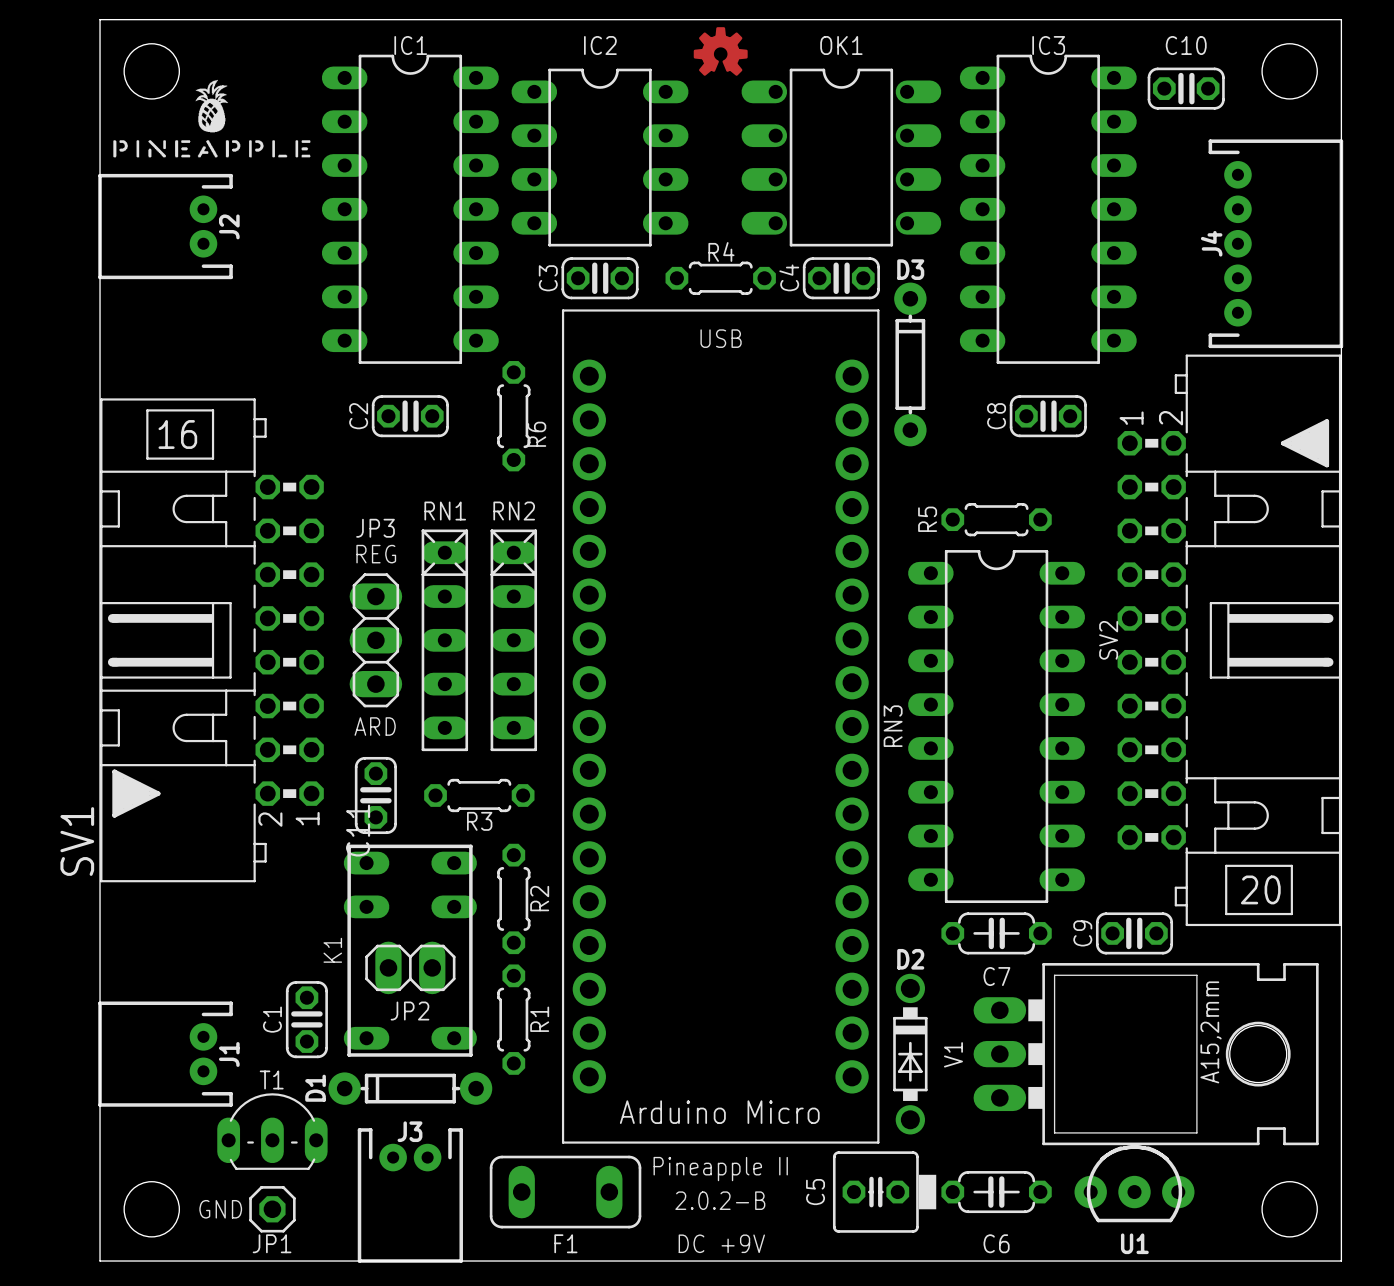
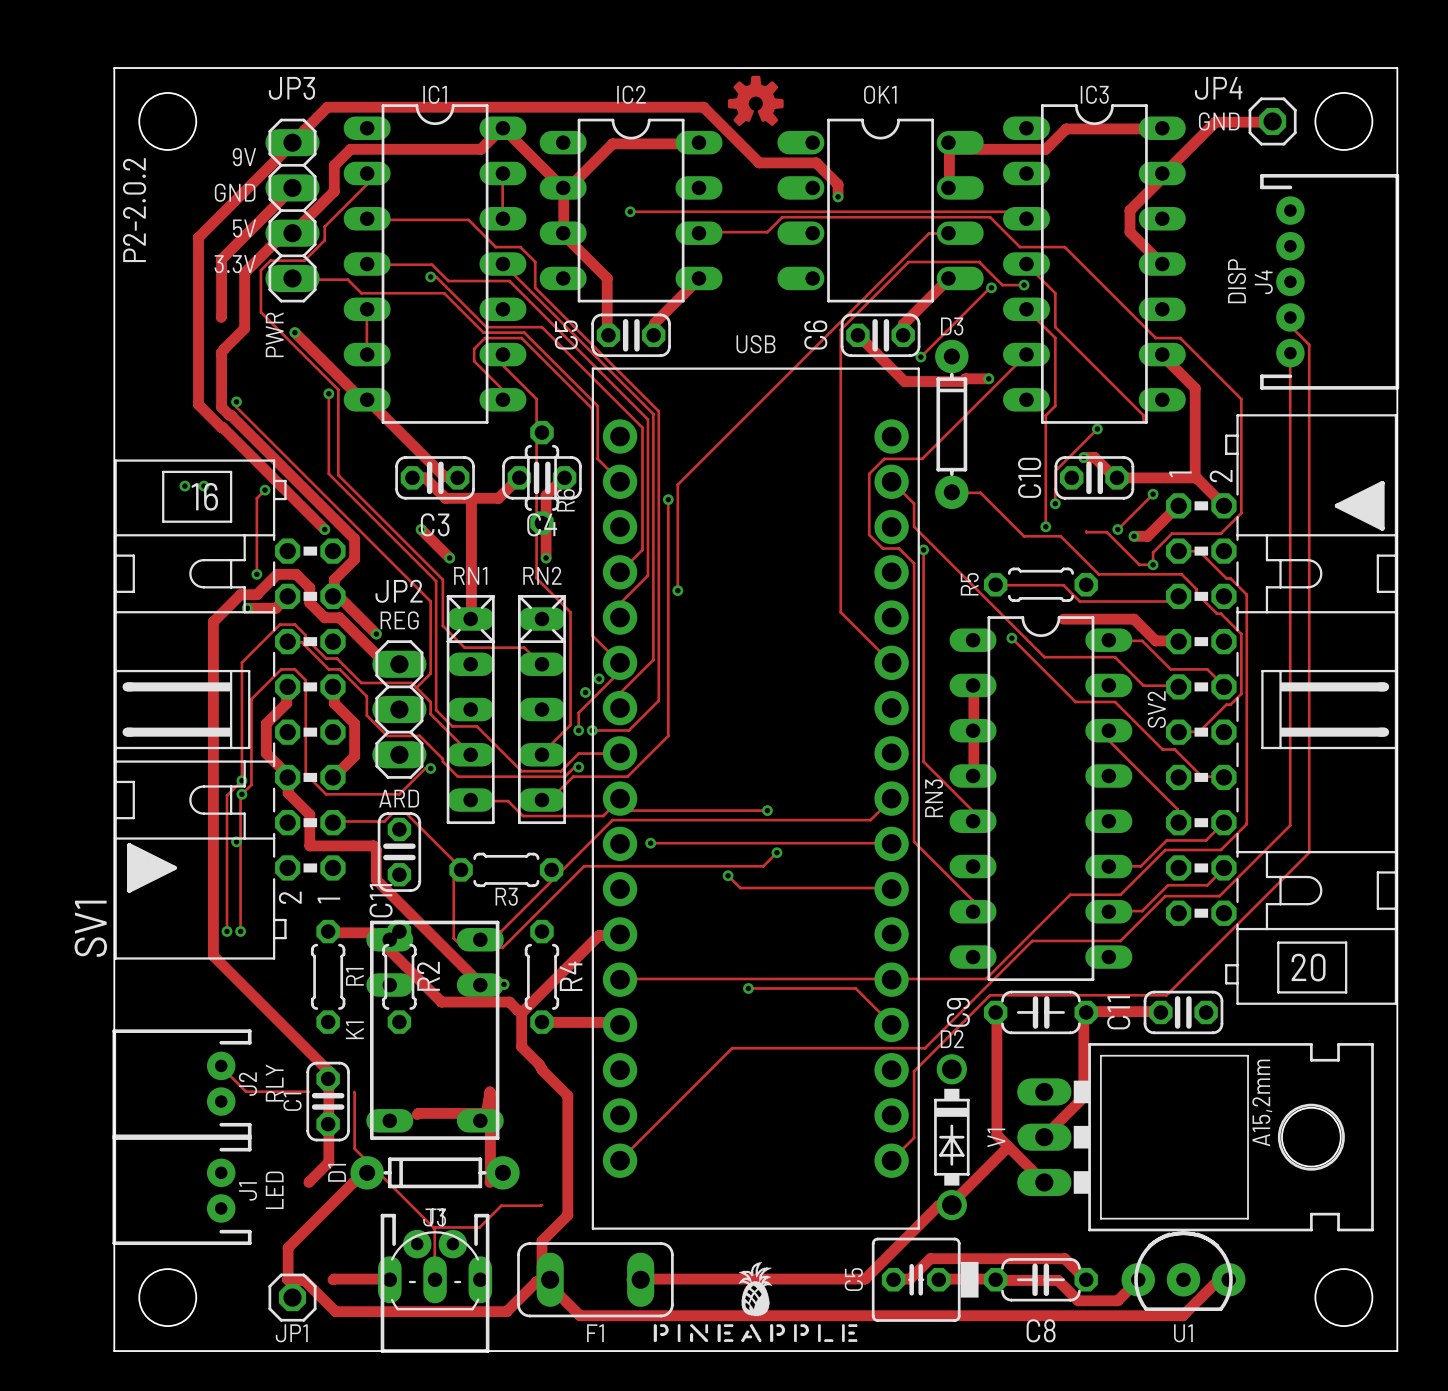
text: none -> GND (1219, 121)
track: none -> (1272, 121) (1215, 122) (1166, 171) (1161, 173) (1161, 179) (1129, 210) (1129, 232) (1162, 264)
JP4: none -> (1272, 121)
track: none -> (1162, 128) (1066, 128) (1045, 149) (953, 149) (948, 142) (948, 187)
drawing: [113, 79, 311, 158] -> none
C10: (1186, 88) -> none
track: none -> (698, 142) (612, 143) (569, 187) (563, 187)
text: none -> 9V (244, 157)
track: none -> (367, 173) (366, 184) (324, 226) (324, 240) (304, 260) (270, 260) (260, 270) (260, 312) (338, 389) (338, 475) (442, 579) (442, 625) (464, 647) (524, 647) (541, 664)
track: none -> (502, 173) (502, 218)
track: none -> (292, 187) (221, 259) (221, 317)
track: none -> (563, 187) (563, 233) (607, 278) (608, 335)
track: none -> (563, 187) (502, 128) (480, 149) (350, 149) (334, 165) (334, 191) (292, 233) (284, 233) (244, 272) (244, 328) (221, 353) (221, 407) (354, 539) (354, 559) (334, 579) (332, 596) (339, 597) (376, 634)
text: none -> GND (235, 192)
track: none -> (838, 196) (838, 184) (816, 162) (759, 162) (703, 107) (327, 107) (198, 237) (198, 404) (324, 529)
via: none -> (838, 196)
text: none -> P2-2.0.2 (134, 210)
JP3: none -> (292, 210)
track: none -> (630, 211) (1018, 211) (1026, 218)
via: none -> (630, 211)
track: none -> (367, 218) (468, 219) (495, 247) (520, 247) (535, 262) (535, 287) (658, 411) (658, 700) (628, 730) (592, 730)
text: none -> 5V (244, 228)
track: none -> (698, 233) (767, 232) (782, 217) (990, 217) (1020, 247) (1064, 247) (1155, 338) (1180, 338) (1241, 399) (1241, 513) (1220, 533) (1172, 533) (1153, 552) (1153, 564) (1139, 564) (1106, 532) (1086, 531)
track: none -> (948, 233) (929, 233) (677, 484) (677, 590)
text: none -> 3.3V (235, 264)
track: none -> (367, 264) (432, 264) (448, 281) (509, 281) (647, 419) (647, 575) (620, 602) (620, 617)
track: none -> (502, 264) (653, 414) (653, 659) (620, 692) (620, 708)
track: none -> (1026, 264) (1055, 293) (1055, 327) (1143, 415) (1143, 420)
track: none -> (430, 276) (436, 276) (486, 327) (542, 327) (642, 427) (642, 549) (620, 572)
via: none -> (430, 276)
track: none -> (292, 278) (347, 279) (361, 293) (444, 293) (483, 332) (524, 332) (597, 405) (597, 458) (620, 481)
track: none -> (698, 278) (654, 323) (653, 335)
track: none -> (948, 278) (903, 324) (903, 335)
J2 position: (165, 226) -> (182, 1083)
text: none -> DISP (1236, 281)
track: none -> (1024, 285) (1002, 285) (979, 262) (908, 262) (840, 329) (840, 612) (891, 662)
via: none -> (1024, 285)
track: none -> (991, 287) (920, 357)
via: none -> (991, 287)
J4 position: (1275, 243) -> (1329, 281)
track: none -> (367, 309) (366, 354)
track: none -> (1026, 309) (1055, 338) (1055, 405) (1045, 415) (1045, 526)
track: none -> (1290, 317) (1291, 327) (1309, 344) (1309, 852) (1166, 995) (990, 995) (914, 1071) (914, 1137) (891, 1160)
track: none -> (294, 332) (360, 397) (368, 400) (444, 476) (457, 477)
via: none -> (294, 332)
text: none -> PWR (274, 334)
C4 name: C4 (789, 277) -> C6 (815, 334)
C3 name: C3 (548, 278) -> C5 (566, 334)
R4: (720, 278) -> none
track: none -> (857, 335) (904, 381) (962, 381) (965, 378) (988, 378)
track: none -> (1290, 353) (1290, 825) (1219, 896) (1165, 896) (1120, 940) (1032, 940) (924, 1048) (732, 1048) (620, 1160)
track: none -> (502, 354) (504, 366) (536, 399) (536, 578) (570, 612) (570, 725) (541, 754)
track: none -> (1026, 354) (922, 458) (884, 458) (869, 473) (869, 534) (882, 548) (899, 548) (914, 563) (914, 841) (972, 900) (973, 911)
track: none -> (1162, 354) (1195, 388) (1195, 477)
via: none -> (920, 357)
via: none -> (988, 378)
track: none -> (328, 393) (328, 473) (436, 581) (436, 710) (452, 726) (476, 726) (521, 771) (561, 771) (578, 753) (620, 753)
via: none -> (328, 393)
text position: USB (721, 338) -> USB (755, 344)
track: none -> (502, 399) (502, 389) (474, 361) (474, 348) (485, 338) (521, 338) (592, 408) (592, 635) (620, 662) (619, 672) (578, 712) (578, 730)
track: none -> (236, 401) (236, 407) (430, 601) (430, 673) (416, 687)
via: none -> (236, 401)
track: none -> (1097, 429) (1055, 471) (1055, 503)
via: none -> (1097, 429)
track: none -> (1083, 457) (1094, 457) (1117, 477) (1196, 477) (1223, 505)
via: none -> (1083, 457)
C2 name: C2 (358, 416) -> C3 (435, 524)
track: none -> (412, 477) (425, 477) (445, 498) (498, 498) (519, 477)
C4: none -> (541, 477)
track: none -> (564, 477) (546, 495) (546, 558)
C8 name: C8 (996, 416) -> C10 (1029, 477)
track: none -> (891, 481) (914, 503) (914, 526) (1044, 657) (1115, 657) (1143, 685) (1178, 686)
via: none -> (184, 486)
via: none -> (203, 486)
track: none -> (265, 490) (256, 498) (256, 574)
via: none -> (265, 490)
track: none -> (951, 492) (980, 492) (1024, 536) (1060, 536) (1098, 574) (1181, 574) (1196, 589) (1196, 593) (1241, 634) (1241, 693) (1230, 704) (1226, 704) (1199, 731) (1178, 732)
track: none -> (1153, 494) (1117, 529)
via: none -> (1153, 494)
track: none -> (471, 498) (470, 619)
track: none -> (668, 499) (668, 735) (627, 776) (573, 776) (550, 799) (542, 799)
via: none -> (668, 499)
via: none -> (1055, 503)
track: none -> (1178, 505) (1147, 536) (1134, 536)
via: none -> (1045, 526)
via: none -> (324, 529)
track: none -> (421, 529) (449, 558)
via: none -> (421, 529)
via: none -> (1117, 529)
via: none -> (1134, 536)
track: none -> (923, 549) (923, 761) (972, 810) (973, 821)
via: none -> (923, 549)
track: none -> (1178, 551) (1199, 551) (1226, 578) (1230, 578) (1246, 594) (1246, 824) (1220, 849) (1165, 849) (1120, 894) (1070, 894) (986, 978) (620, 979)
via: none -> (449, 558)
via: none -> (546, 558)
via: none -> (1153, 564)
via: none -> (256, 574)
track: none -> (995, 584) (1063, 585) (1079, 601) (1173, 601) (1178, 596)
via: none -> (677, 590)
JP3 name: JP3 (375, 528) -> JP2 (399, 591)
track: none -> (287, 596) (275, 608) (247, 608)
via: none -> (247, 608)
track: none -> (1063, 619) (1134, 619) (1155, 640) (1178, 641)
via: none -> (376, 634)
track: none -> (1011, 638) (1075, 701) (1115, 701) (1162, 749) (1174, 749) (1201, 776) (1223, 777)
via: none -> (1011, 638)
track: none -> (1108, 640) (1142, 640) (1170, 669) (1207, 669) (1223, 686)
track: none -> (287, 641) (301, 642) (328, 669) (339, 669) (366, 696) (366, 715) (387, 735) (419, 735) (457, 776) (565, 776) (574, 767) (578, 767)
track: none -> (399, 664) (385, 663) (339, 617) (324, 617) (309, 602) (309, 587) (296, 574) (277, 574) (256, 594) (240, 594) (213, 621) (213, 955) (328, 1071) (328, 1162) (308, 1182)
via: none -> (599, 678)
track: none -> (973, 685) (973, 775)
track: none -> (287, 686) (286, 703) (266, 723) (266, 753) (285, 772) (288, 778) (288, 792) (309, 814) (309, 845) (373, 845) (376, 849) (376, 879) (480, 984) (504, 984)
track: none -> (332, 686) (334, 703) (354, 723) (354, 756) (332, 777)
via: none -> (585, 692)
via: none -> (578, 730)
via: none -> (592, 730)
track: none -> (1108, 730) (1109, 741) (1177, 809) (1178, 822)
track: none -> (470, 754) (430, 714) (430, 701) (411, 682) (361, 682) (336, 658) (326, 658) (294, 624) (279, 624) (241, 662) (241, 780) (227, 795) (227, 931)
via: none -> (578, 767)
track: none -> (430, 768) (425, 768) (399, 794) (326, 794) (305, 773) (305, 680) (294, 669) (281, 669) (251, 699) (251, 784) (240, 795) (240, 931)
via: none -> (430, 768)
via: none -> (241, 780)
via: none -> (241, 794)
track: none -> (891, 798) (870, 820) (612, 820) (501, 931) (470, 931)
track: none -> (470, 800) (508, 801) (523, 816) (603, 816) (620, 798) (631, 810) (767, 810)
via: none -> (767, 810)
track: none -> (332, 822) (384, 821) (392, 813) (406, 813) (453, 860) (453, 938) (463, 947) (502, 947) (584, 866) (763, 866) (776, 852)
track: none -> (1223, 822) (1206, 840) (1166, 840) (1140, 866) (1108, 866)
via: none -> (236, 841)
track: none -> (650, 843) (891, 843)
via: none -> (650, 843)
via: none -> (776, 852)
track: none -> (1223, 867) (1207, 885) (1168, 885) (1142, 911) (1108, 911)
C11 position: (375, 795) -> (399, 852)
track: none -> (728, 875) (740, 888) (891, 889)
via: none -> (728, 875)
via: none -> (227, 931)
via: none -> (240, 931)
track: none -> (328, 931) (372, 932) (441, 1002) (509, 1002) (521, 1012)
track: none -> (620, 934) (599, 935) (521, 1012)
R2: none -> (399, 976)
R2 name: R2 (539, 898) -> R4 (571, 976)
via: none -> (504, 984)
track: none -> (748, 988) (855, 988) (891, 1024)
via: none -> (748, 988)
track: none -> (521, 1012) (521, 1046) (567, 1095) (567, 1215) (542, 1241) (541, 1279)
track: none -> (995, 1012) (996, 1135) (1044, 1182)
C9 name: C9 (1082, 933) -> C11 (1118, 1012)
track: none -> (1160, 1012) (1086, 1011) (1083, 1017) (1083, 1097) (1044, 1137)
track: none -> (542, 1022) (618, 1022) (620, 1024)
JP2: (410, 967) -> none
C7 name: C7 (996, 976) -> C9 (958, 1012)
track: none -> (221, 1065) (246, 1091) (308, 1091)
text: none -> RLY (274, 1083)
track: none -> (354, 1091) (354, 1148) (434, 1228) (435, 1279)
R1 position: (513, 1019) -> (328, 976)
track: none -> (417, 1114) (486, 1113) (489, 1091) (489, 1182)
J1 position: (165, 1054) -> (182, 1190)
track: none -> (1008, 1146) (951, 1205) (938, 1205) (865, 1279) (631, 1279)
track: none -> (354, 1182) (288, 1247) (287, 1279) (304, 1280) (335, 1311) (506, 1311) (536, 1281) (541, 1279)
text: none -> LED (274, 1190)
text: Arduino Micro (719, 1112) -> none
track: none -> (541, 1205) (501, 1205) (479, 1227) (434, 1228)
T1 position: (272, 1131) -> (435, 1270)
text: Pineapple II (720, 1169) -> none
drawing: none -> [653, 1261, 858, 1342]
track: none -> (332, 1279) (389, 1279)
track: none -> (541, 1279) (546, 1281) (580, 1315) (1182, 1315) (1218, 1280) (1228, 1279)
track: none -> (893, 1279) (910, 1279) (930, 1258) (1064, 1258) (1086, 1279)
track: none -> (938, 1279) (1058, 1280) (1078, 1300) (1117, 1300) (1138, 1279)
text: 2.0.2-B (720, 1200) -> none
text: GND (220, 1209) -> none
text: DC +9V (721, 1243) -> none
C6 name: C6 (996, 1243) -> C8 (1041, 1330)

